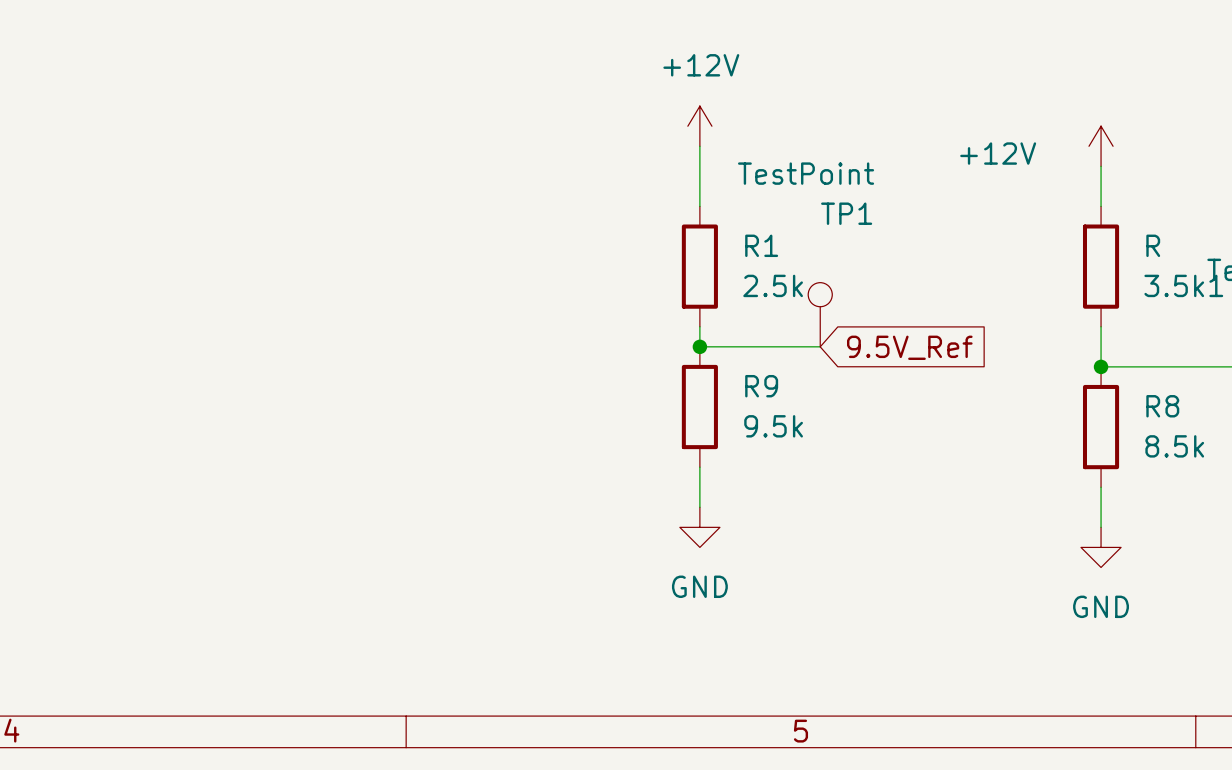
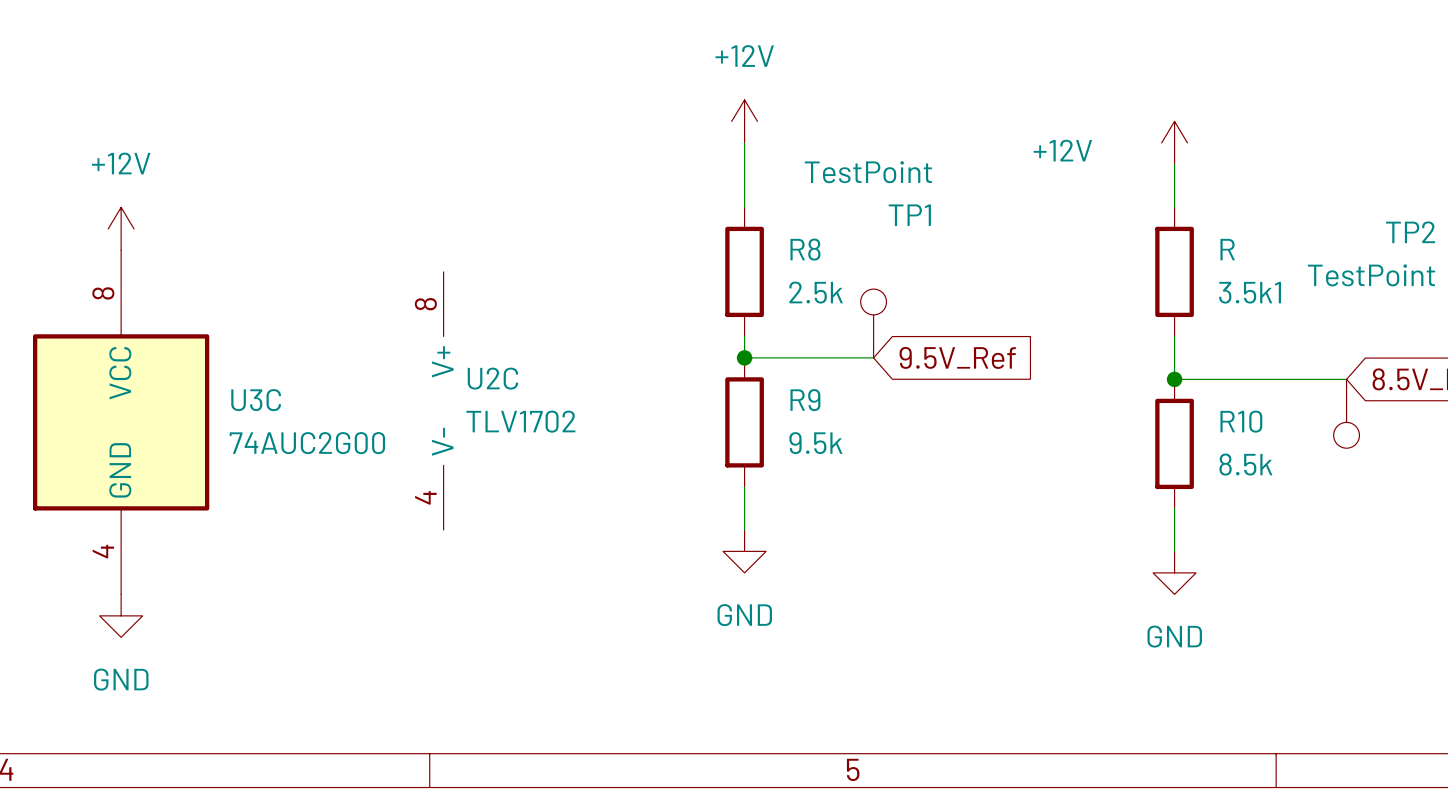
power symbol: none -> +12V (121, 228)
R1 name: R1 (761, 245) -> R8 (805, 249)
U2C: none -> TLV1702 (443, 400)
R8 name: R8 (1162, 406) -> R10 (1241, 421)
U3C: none -> 74AUC2G00 (121, 422)
power symbol: none -> GND (121, 615)

